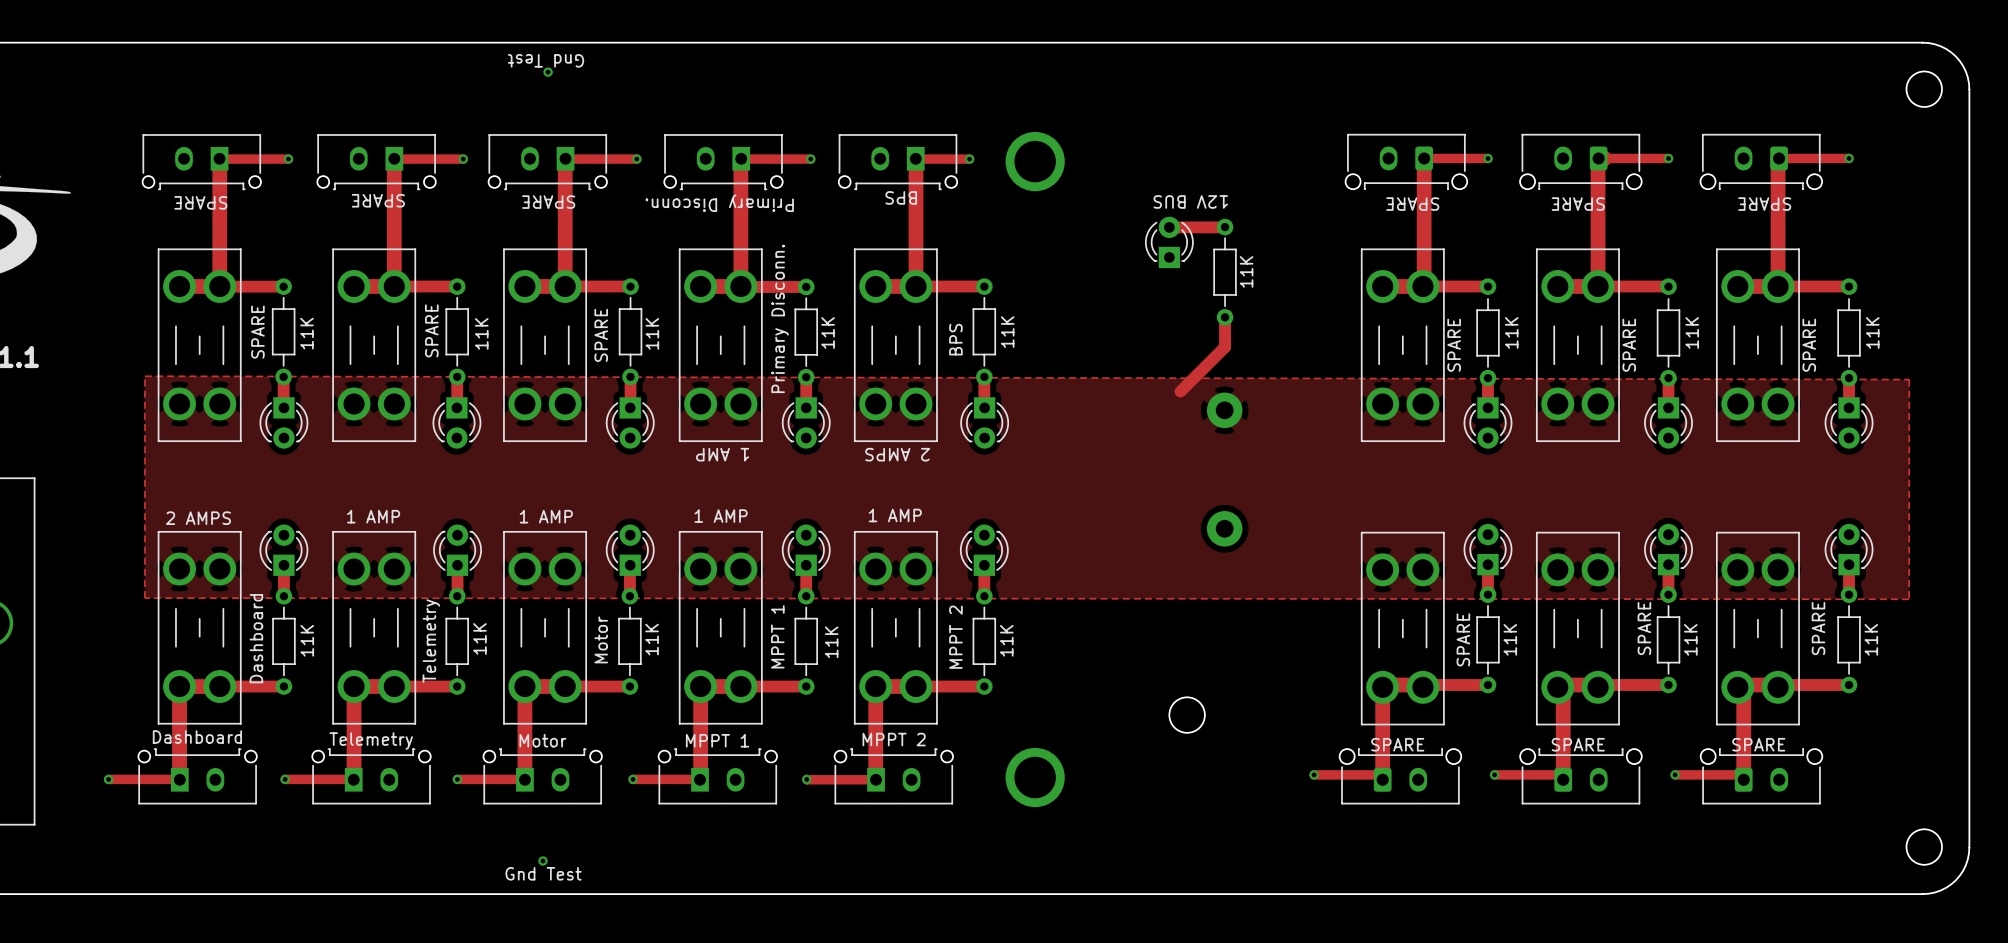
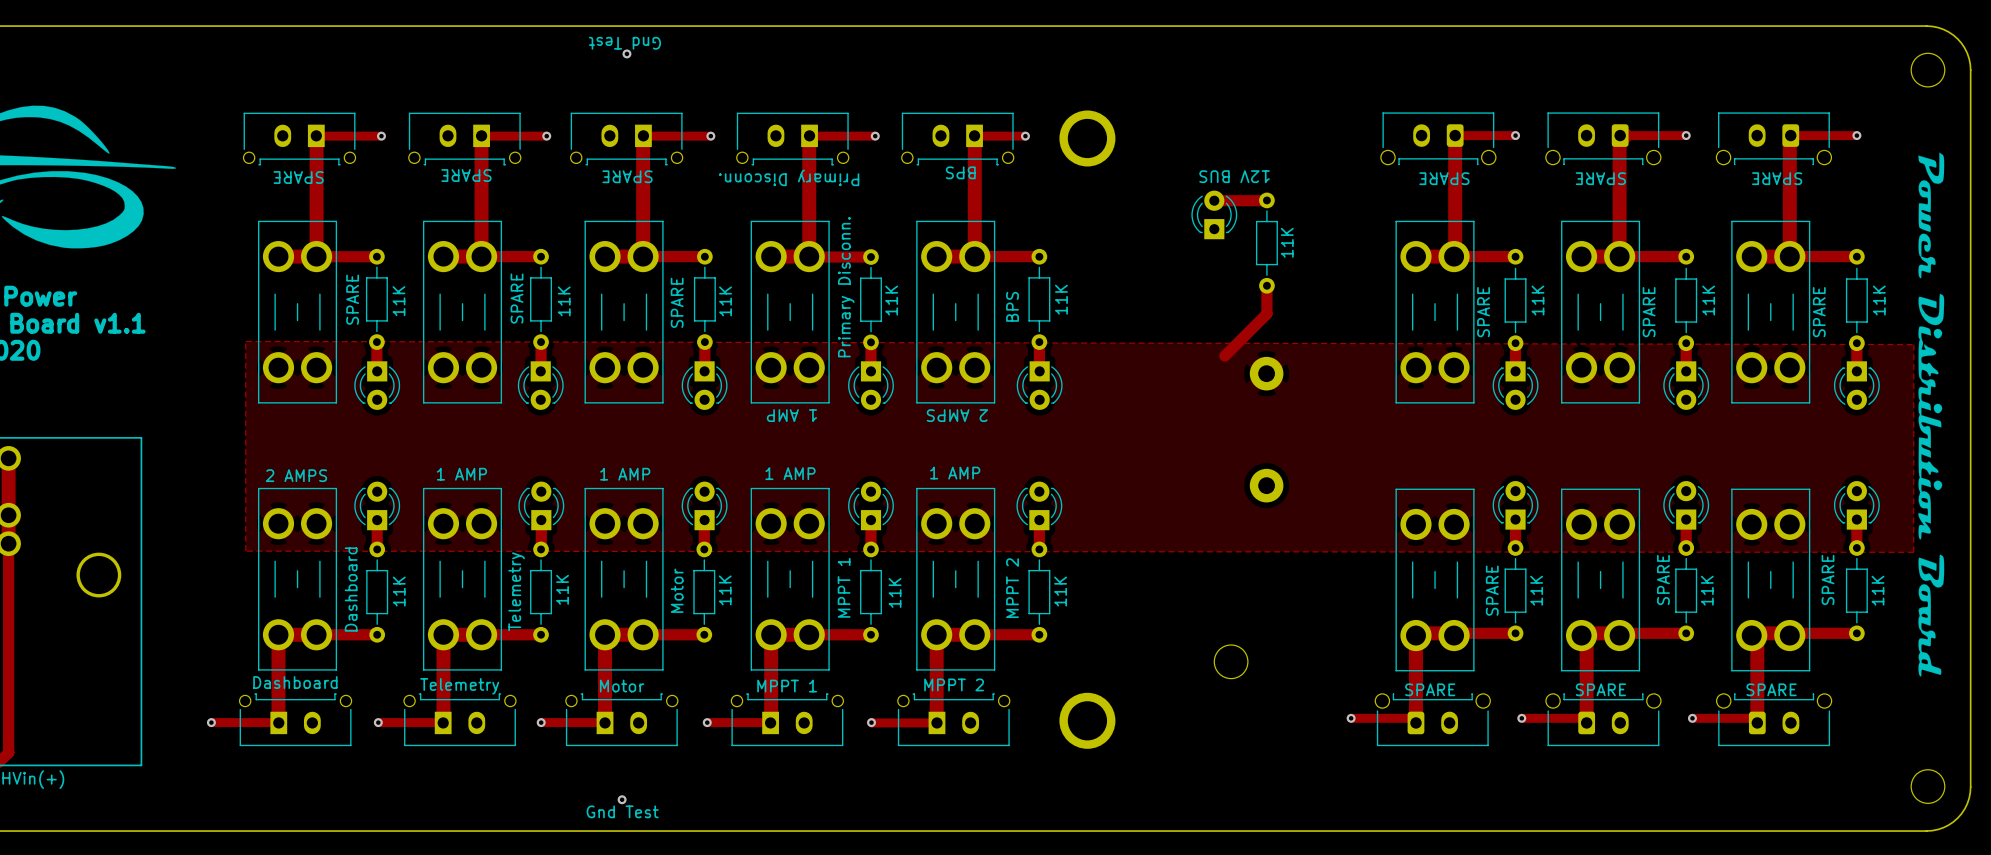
drawing: none -> [1918, 152, 1945, 677]

